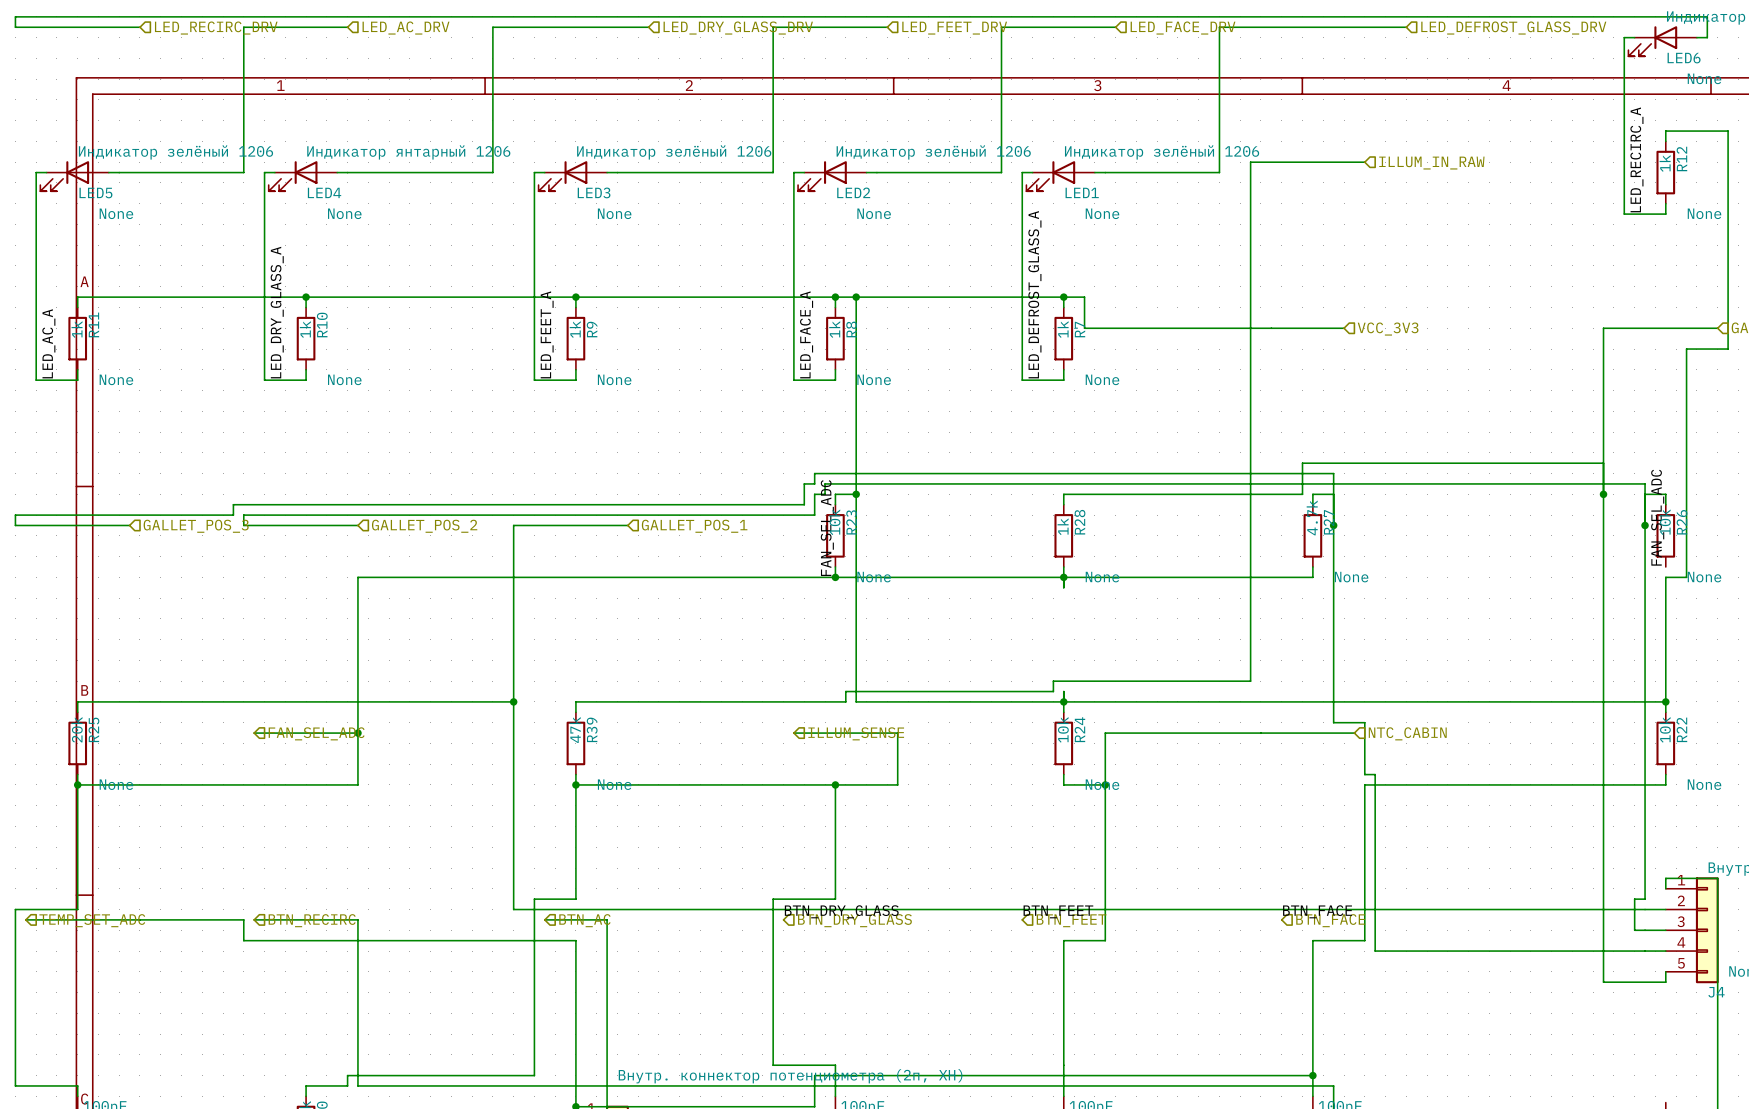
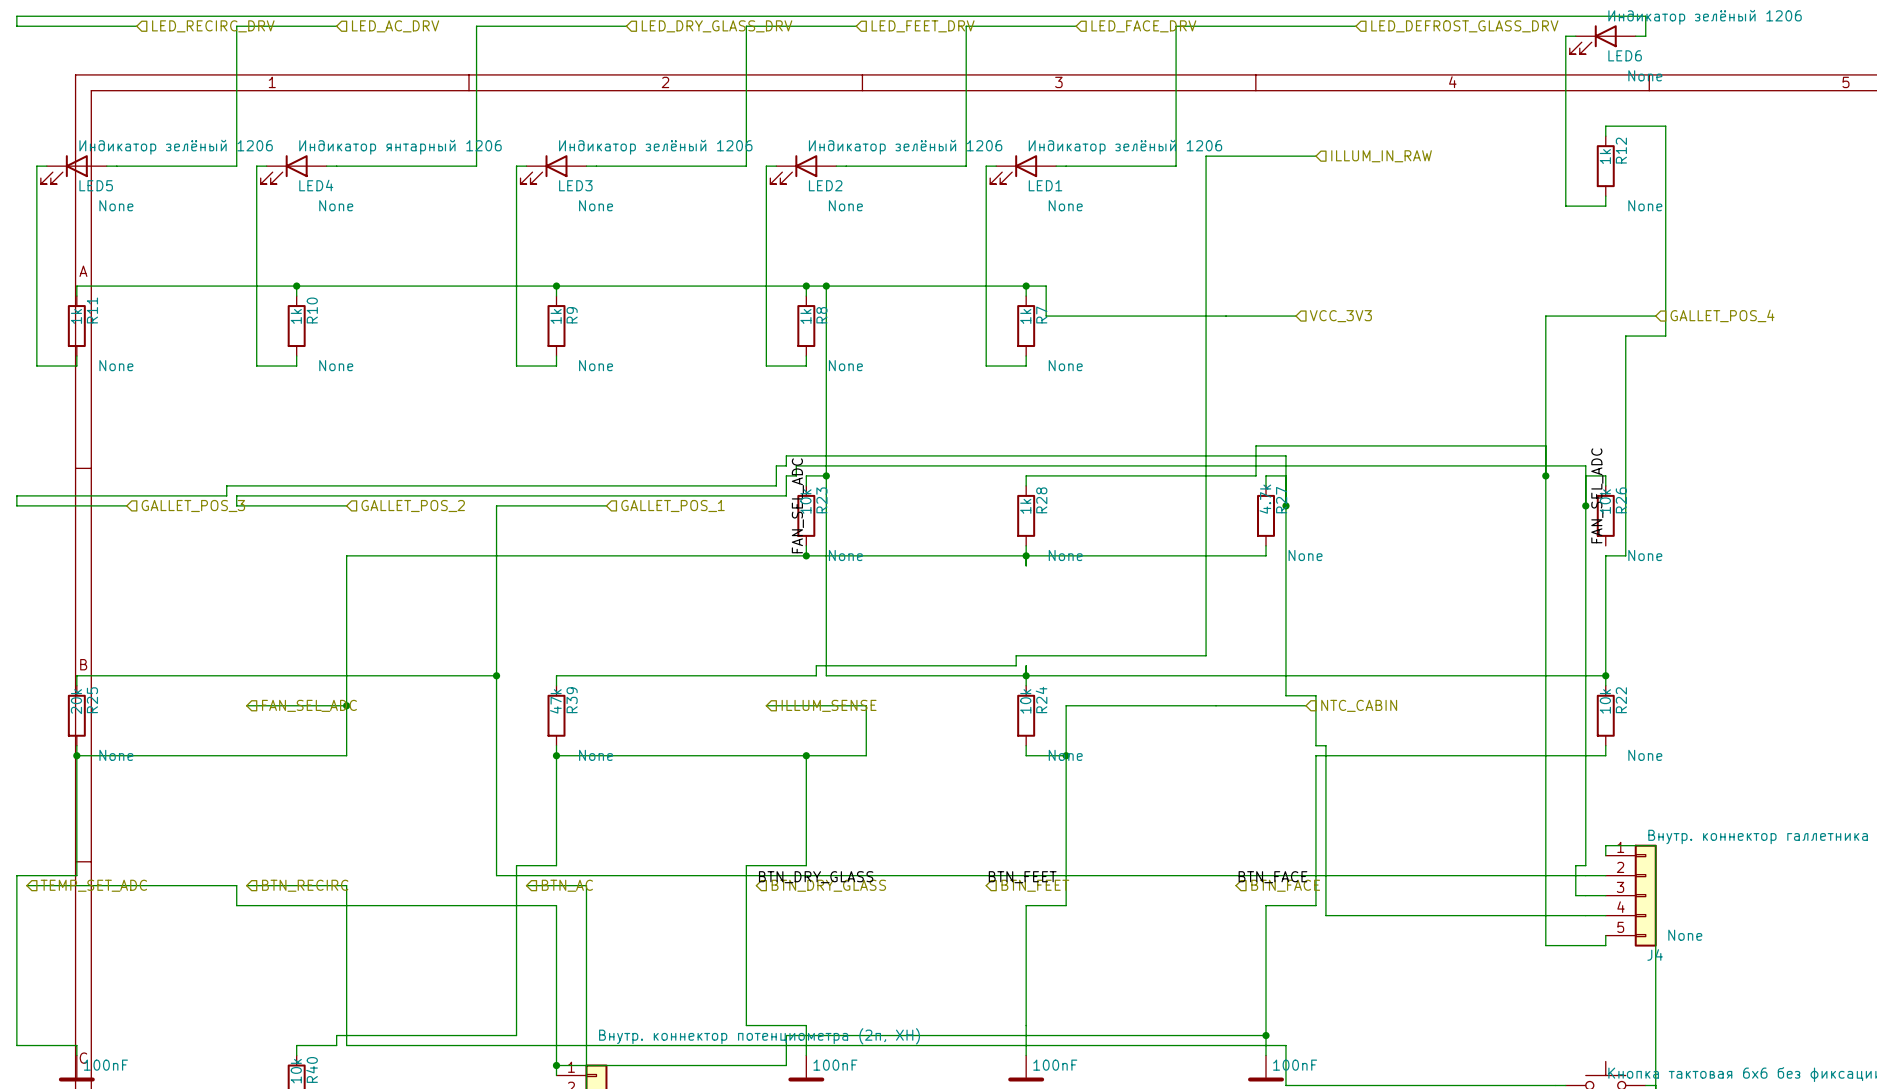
label: LED_RECIRC_A (1636, 159) -> none
label: LED_DEFROST_GLASS_A (1034, 294) -> none
label: LED_DRY_GLASS_A (277, 312) -> none
label: LED_FEET_A (547, 334) -> none
label: LED_FACE_A (806, 334) -> none
label: LED_AC_A (48, 343) -> none

